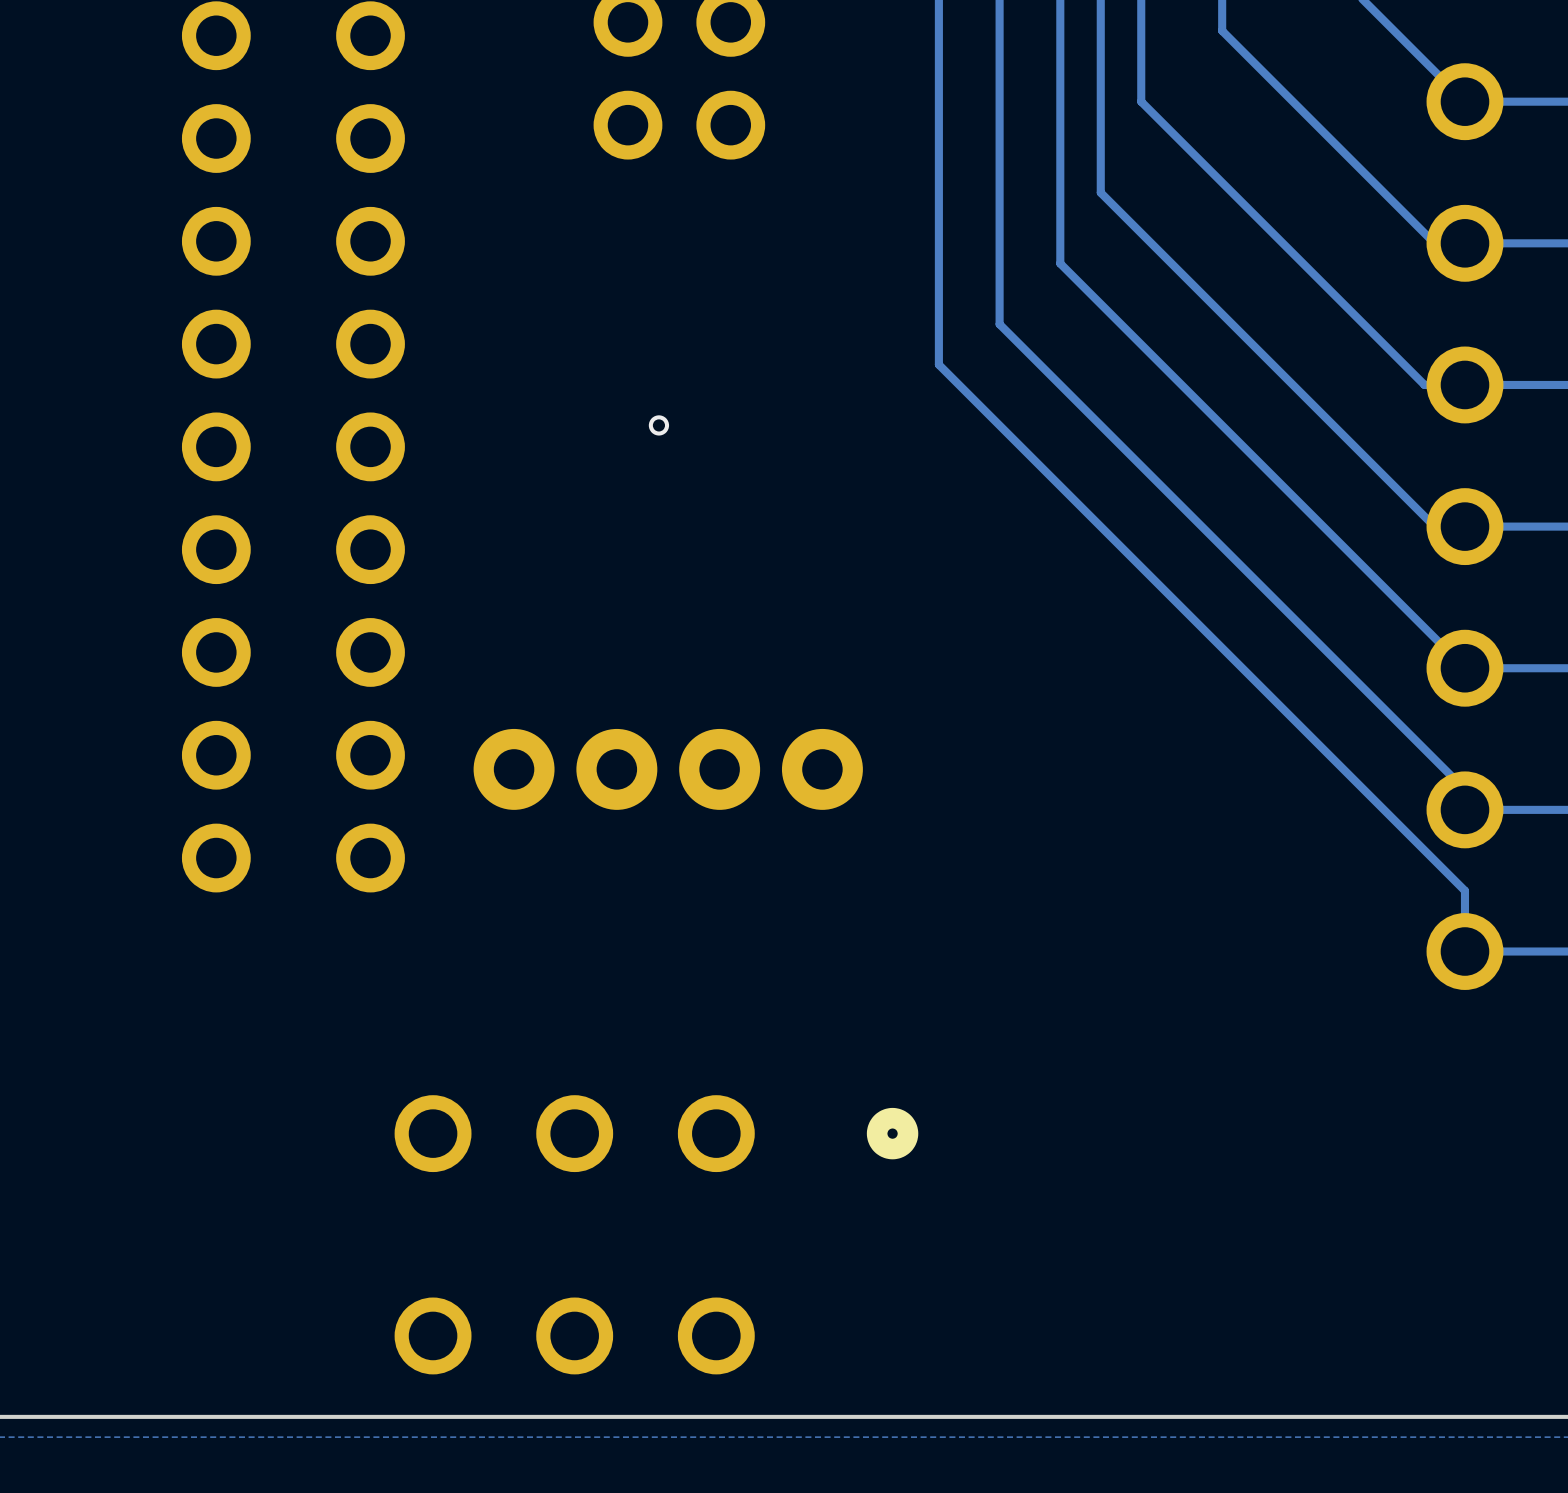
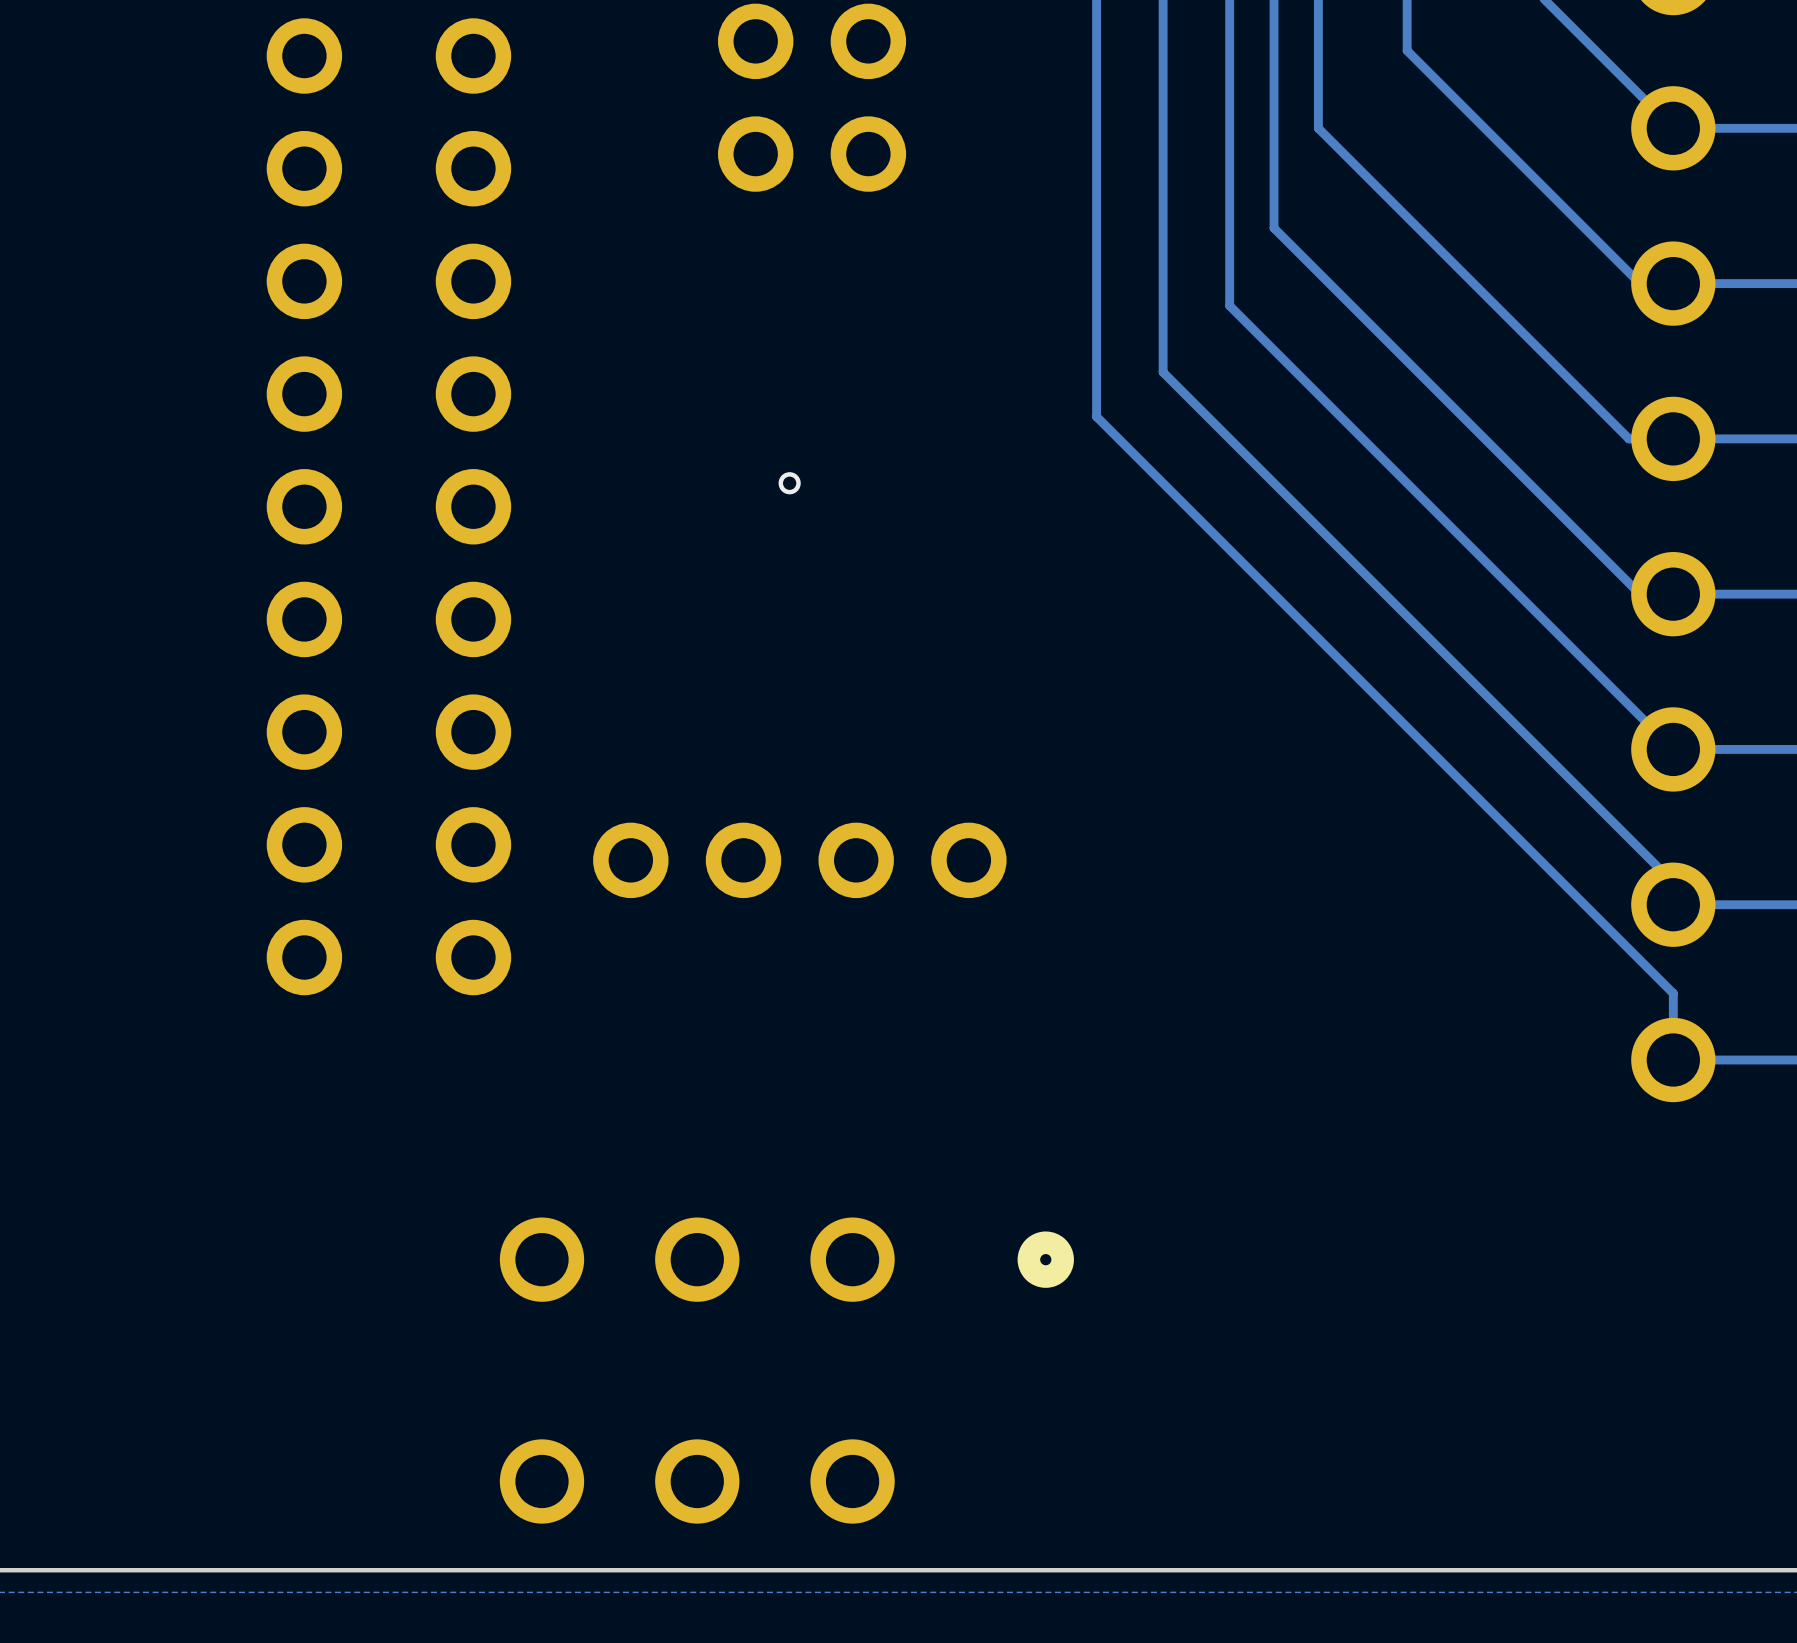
part footprint: [473, 728, 555, 810] -> [593, 822, 669, 899]
part footprint: [576, 728, 658, 810] -> [705, 822, 782, 899]
part footprint: [679, 728, 761, 810] -> [818, 822, 894, 899]
part footprint: [781, 728, 863, 810] -> [931, 822, 1007, 899]

